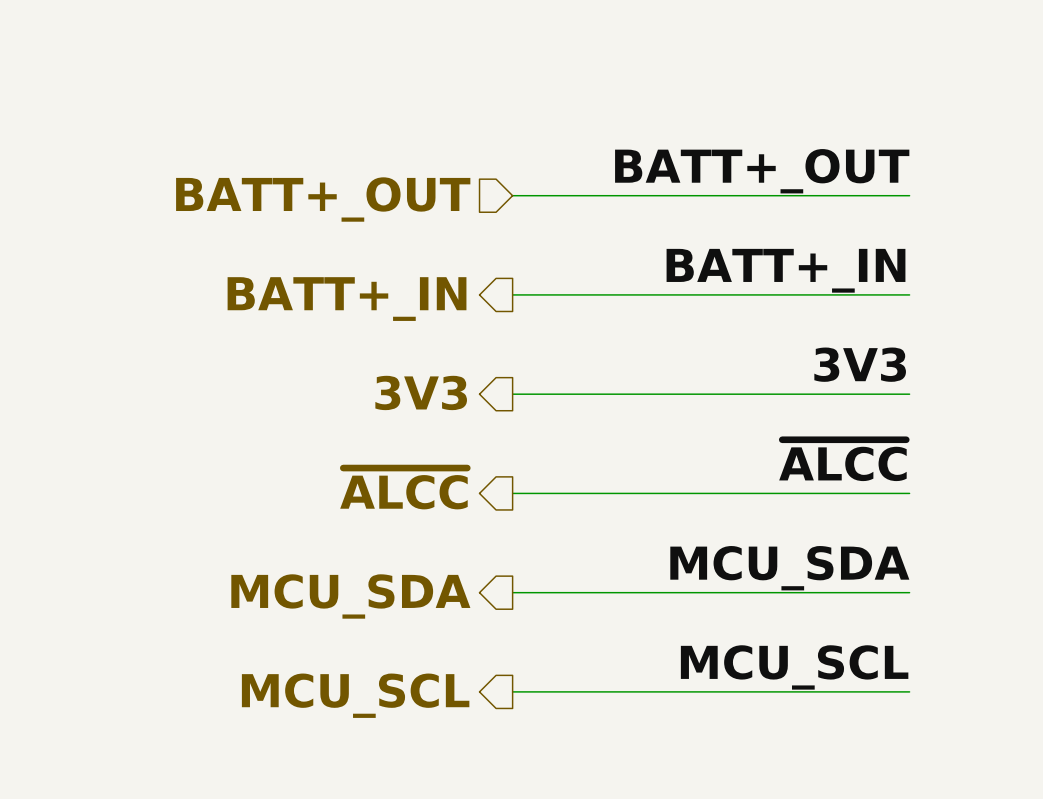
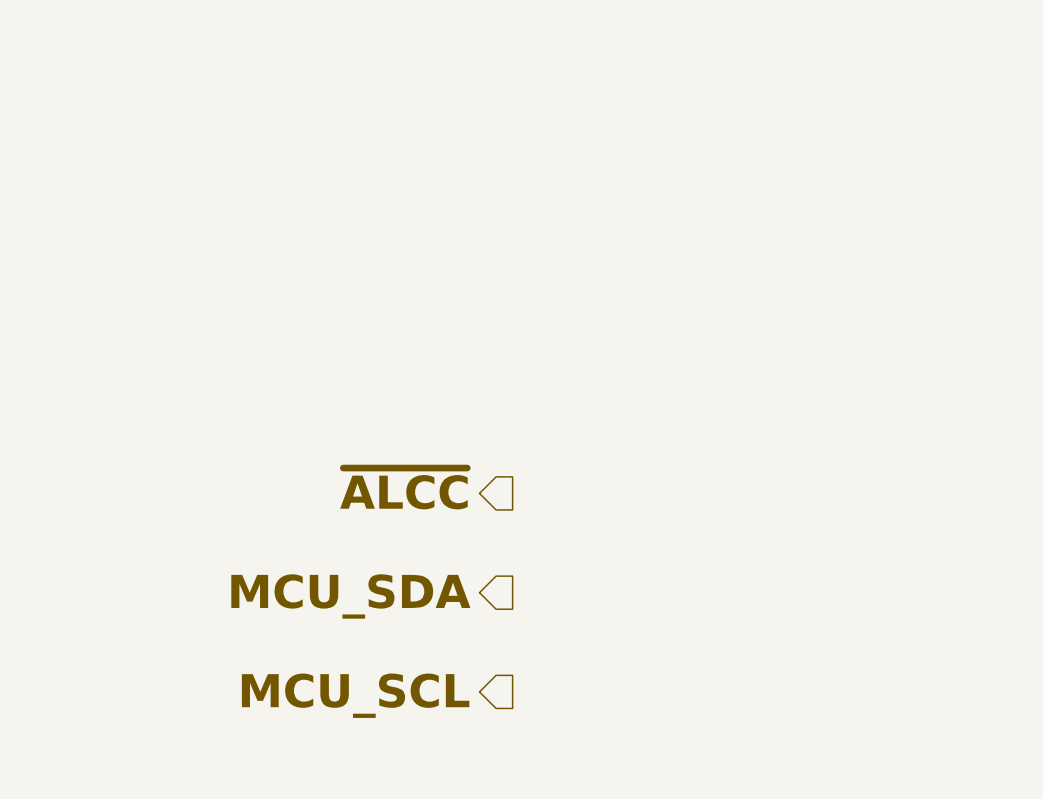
label: BATT+_OUT (762, 171) -> none
wire: (512, 195) (909, 195) -> none
hierarchical label: BATT+_OUT (323, 199) -> none
label: BATT+_IN (786, 270) -> none
wire: (512, 294) (909, 294) -> none
hierarchical label: BATT+_IN (347, 299) -> none
label: 3V3 (860, 364) -> none
hierarchical label: 3V3 (421, 392) -> none
wire: (512, 394) (909, 394) -> none
label: ~{ALCC} (842, 460) -> none
wire: (512, 493) (909, 493) -> none
label: MCU_SDA (789, 568) -> none
wire: (512, 592) (909, 592) -> none
label: MCU_SCL (794, 667) -> none
wire: (512, 691) (909, 691) -> none

